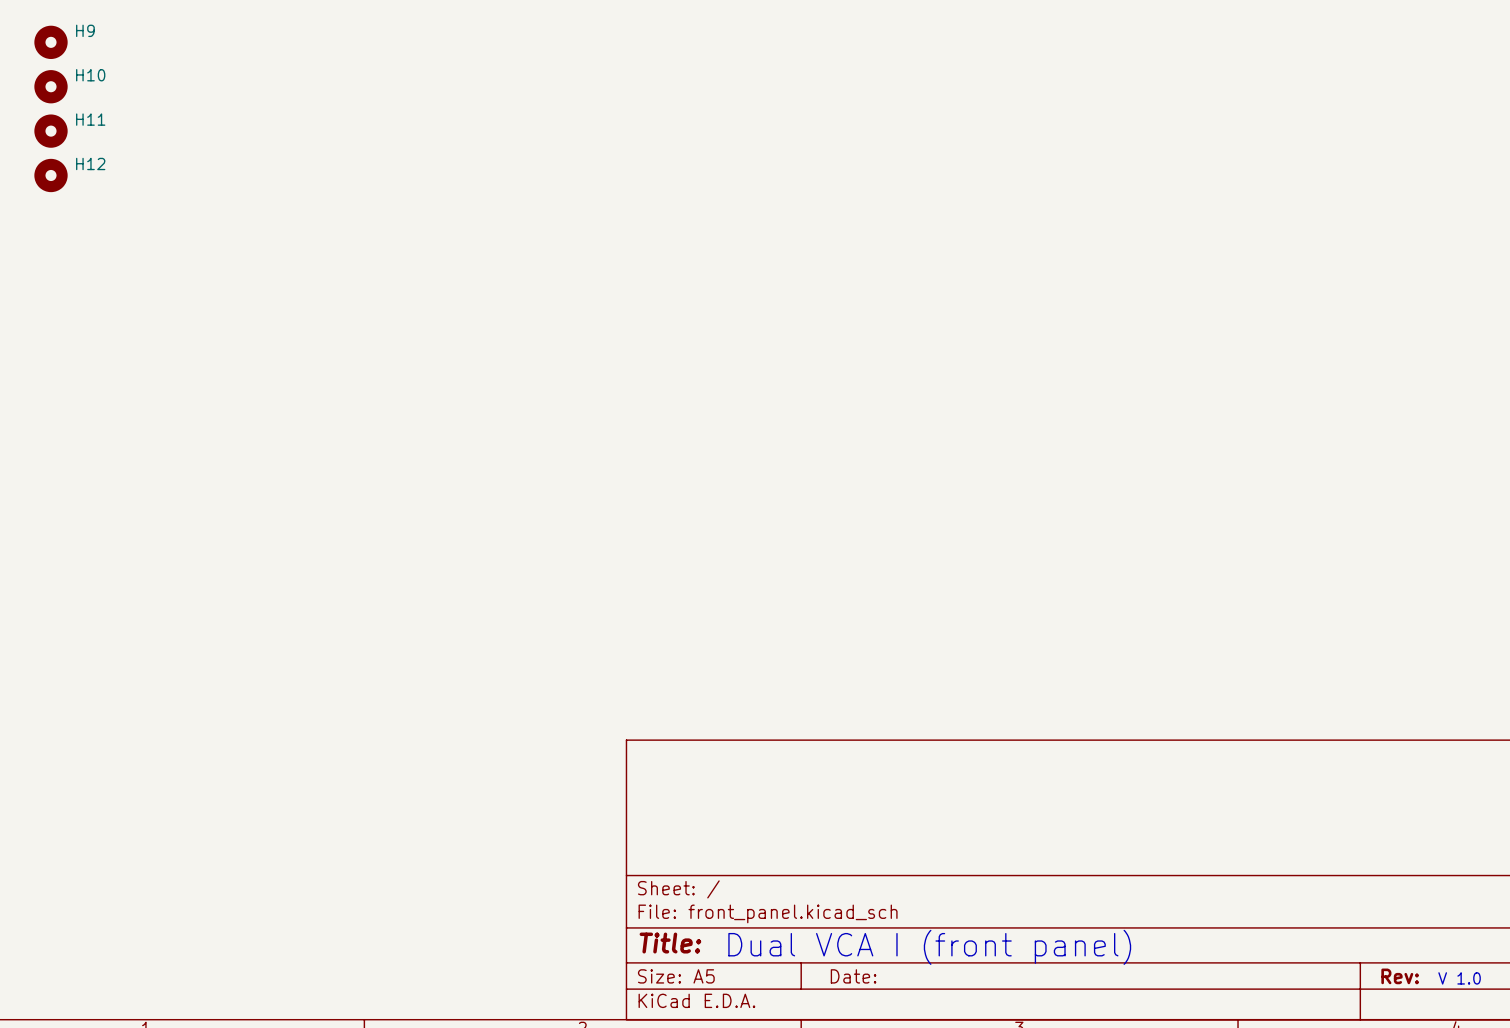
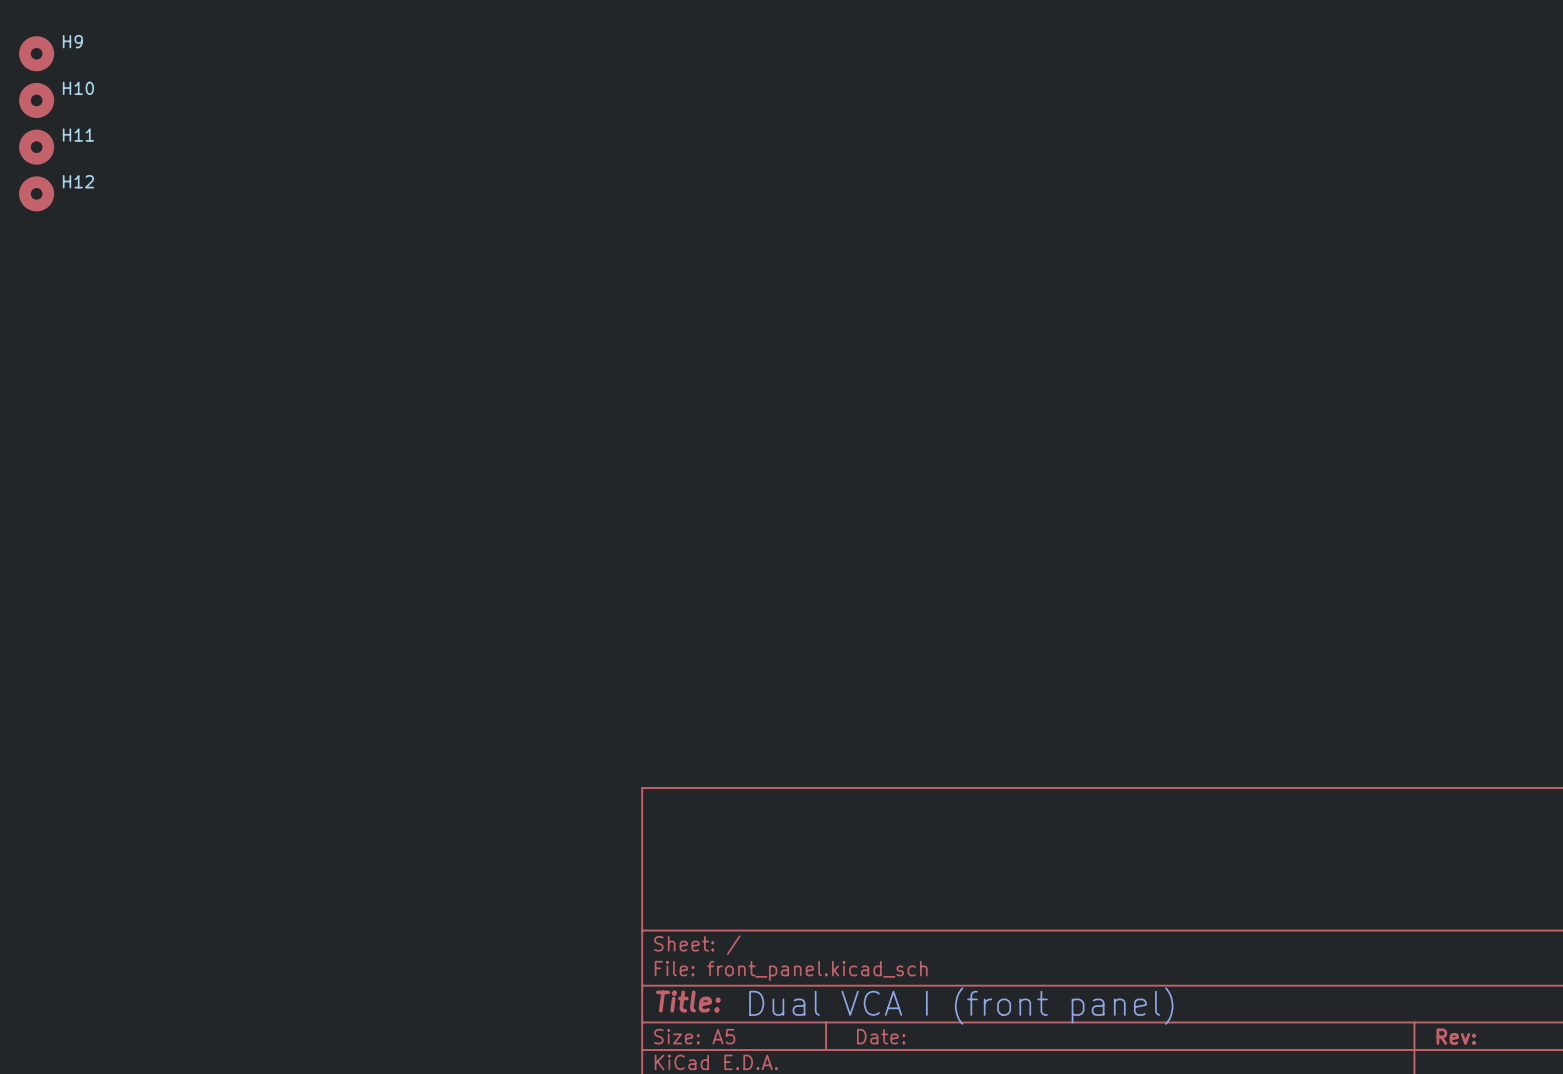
text: V 1.0 (1459, 978) -> none

